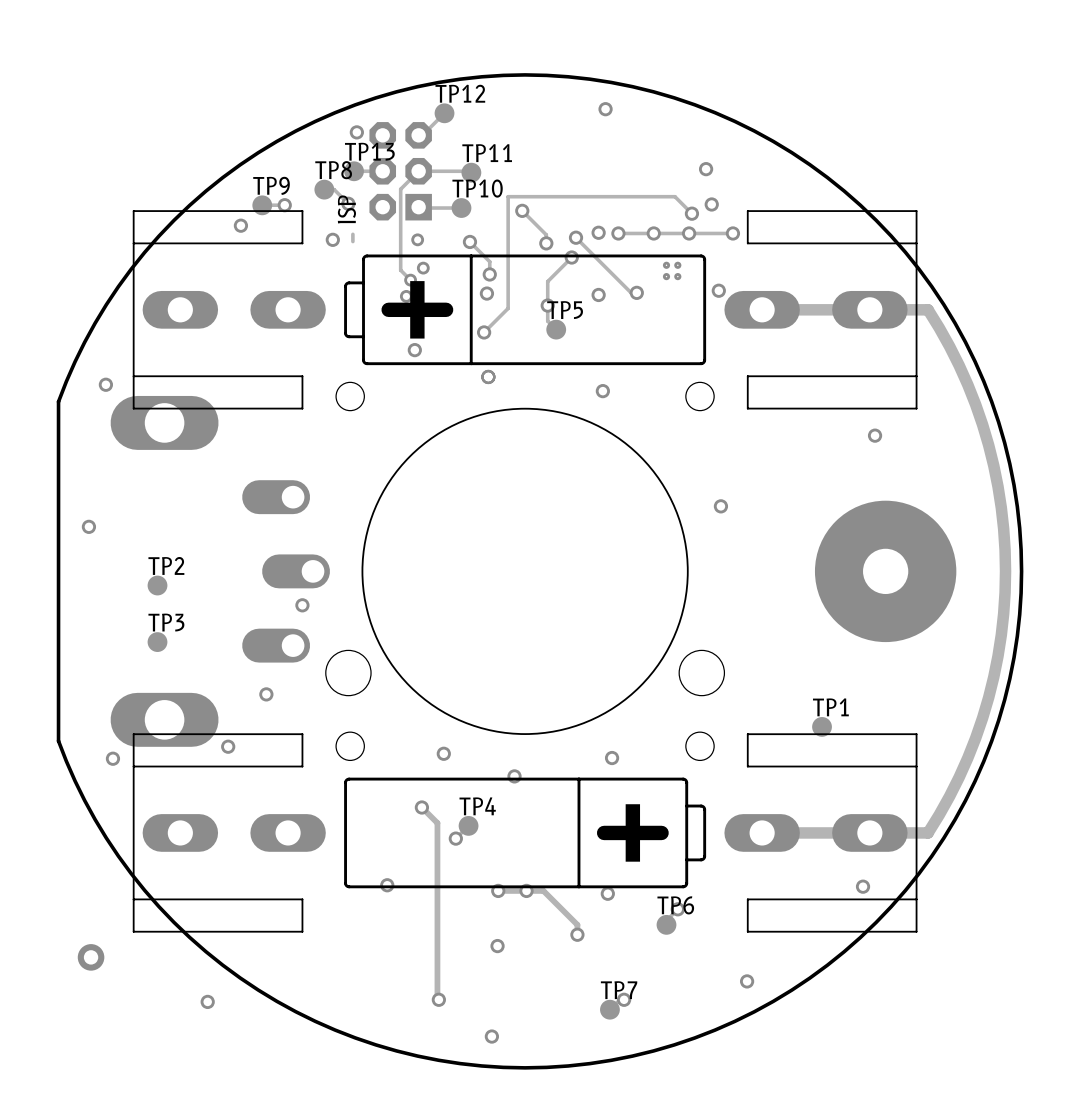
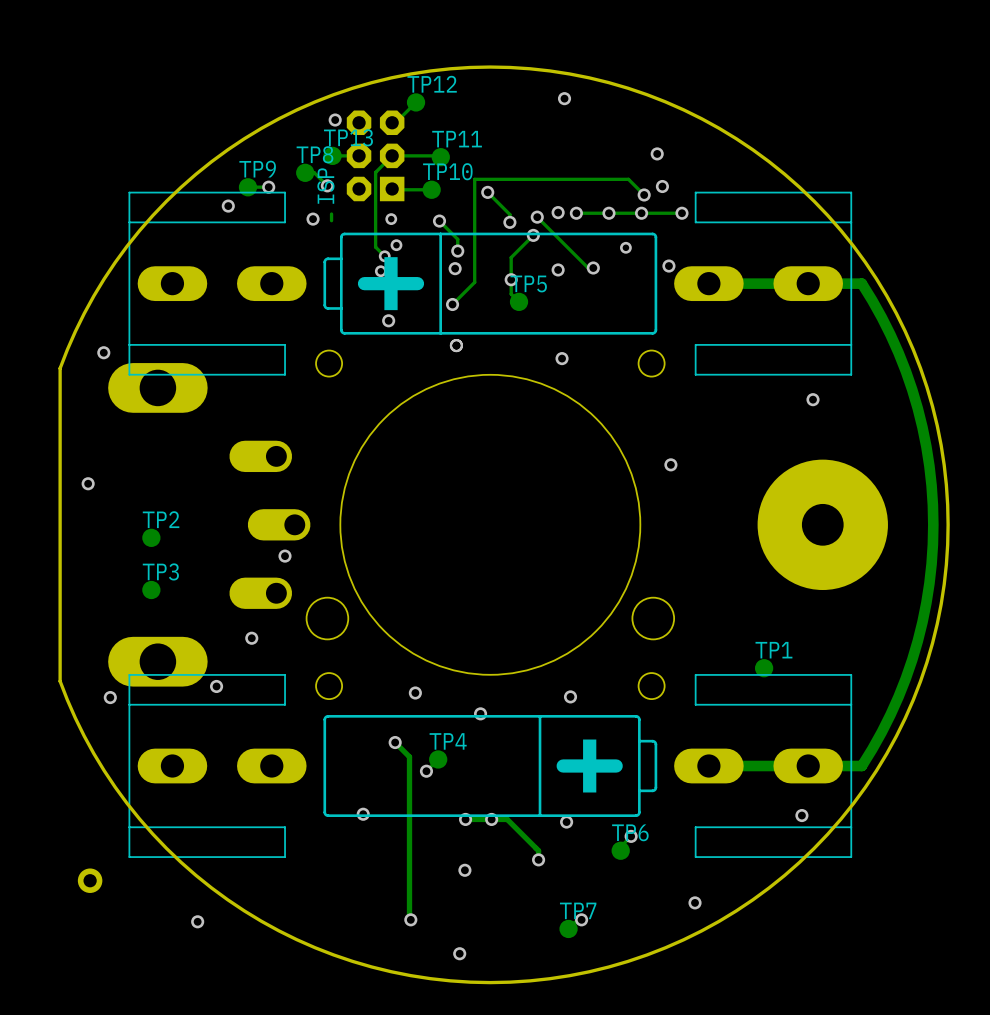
via: (666, 265) -> none
via: (677, 265) -> none
via: none -> (625, 247)
via: (666, 276) -> none
via: (677, 276) -> none

